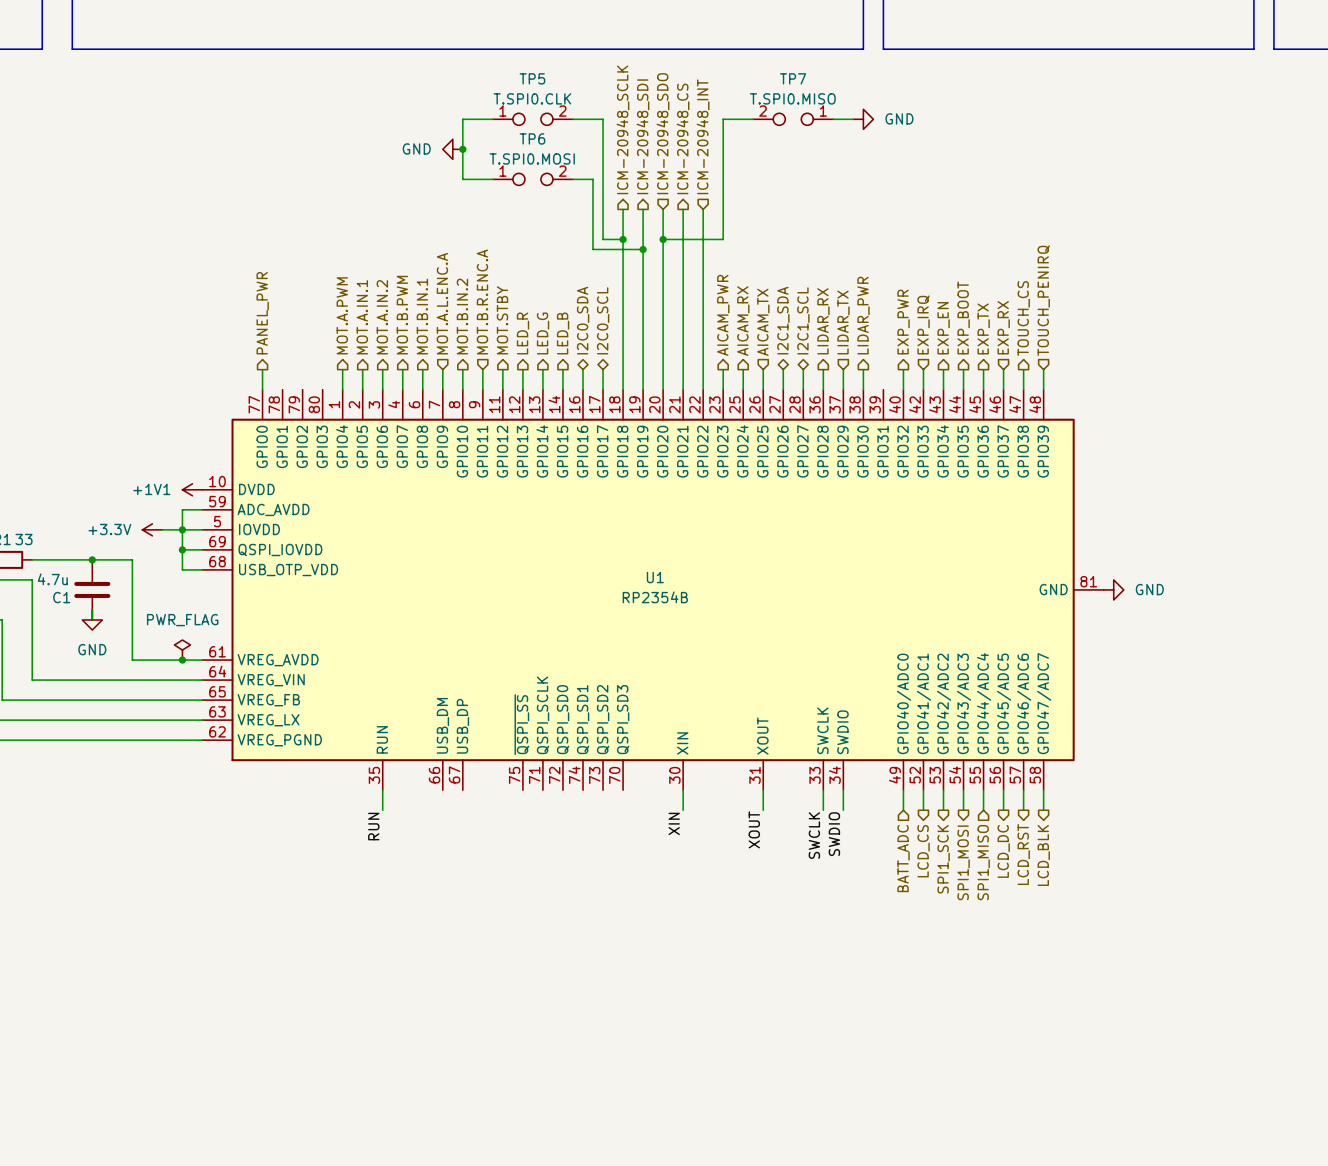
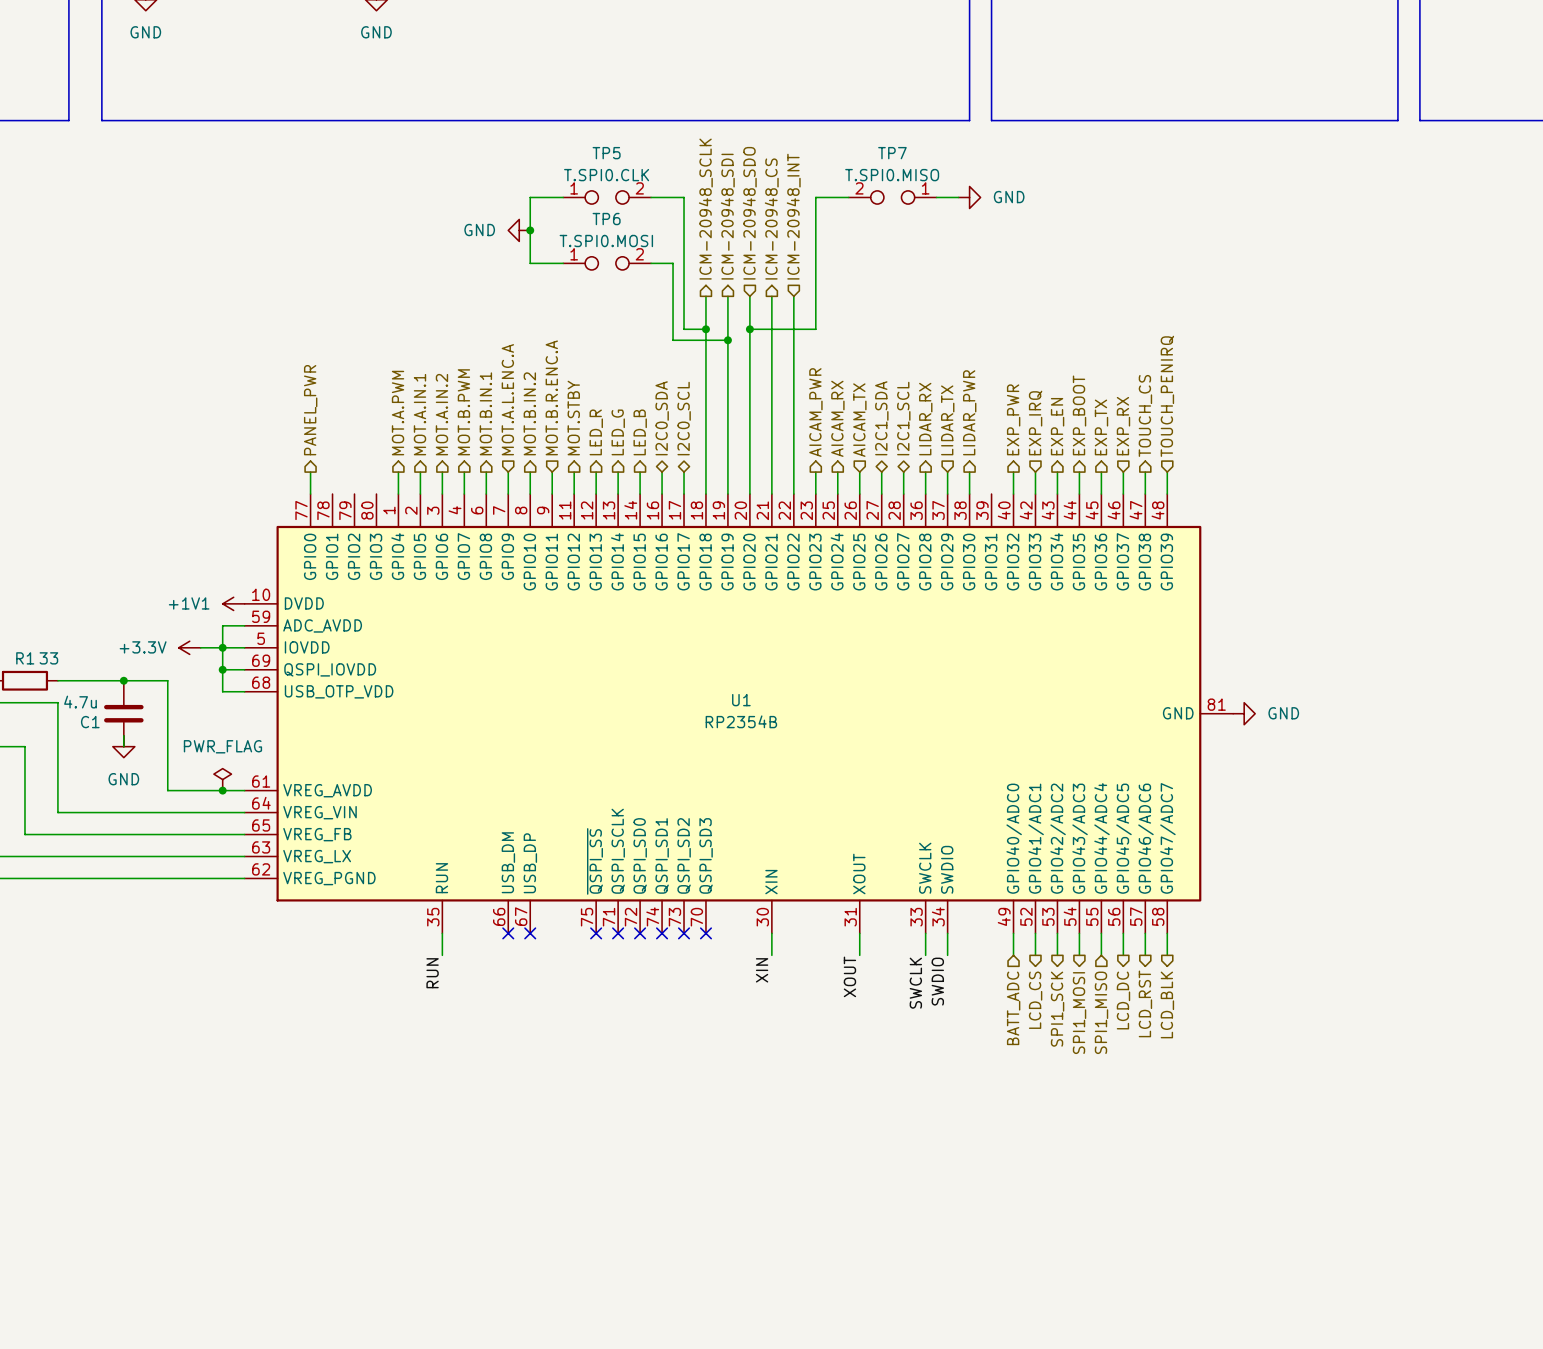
no-connect mark: none -> (508, 933)
no-connect mark: none -> (530, 933)
no-connect mark: none -> (596, 933)
no-connect mark: none -> (618, 933)
no-connect mark: none -> (640, 933)
no-connect mark: none -> (662, 933)
no-connect mark: none -> (684, 933)
no-connect mark: none -> (705, 933)

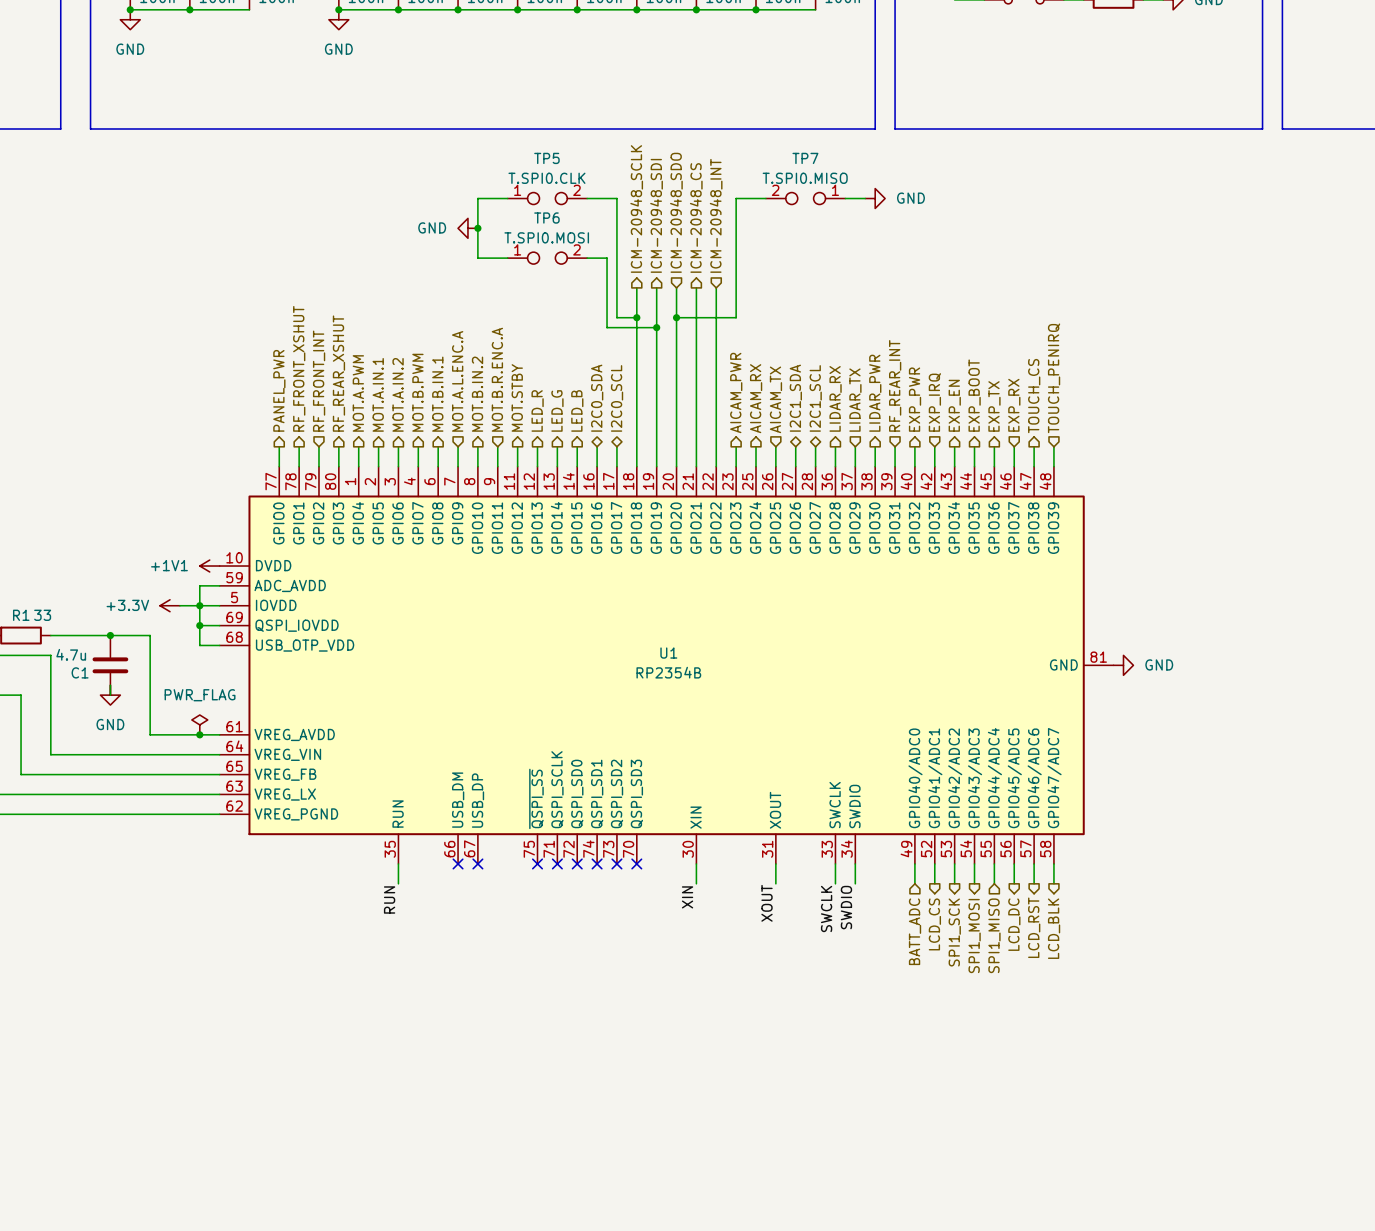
hierarchical label: none -> RF_FRONT_XSHUT (299, 368)
hierarchical label: none -> RF_REAR_XSHUT (338, 373)
hierarchical label: none -> RF_FRONT_INT (319, 381)
hierarchical label: none -> RF_REAR_INT (895, 385)
wire: none -> (299, 446) (299, 466)
wire: none -> (318, 446) (318, 466)
wire: none -> (338, 446) (338, 466)
wire: none -> (895, 446) (895, 466)

